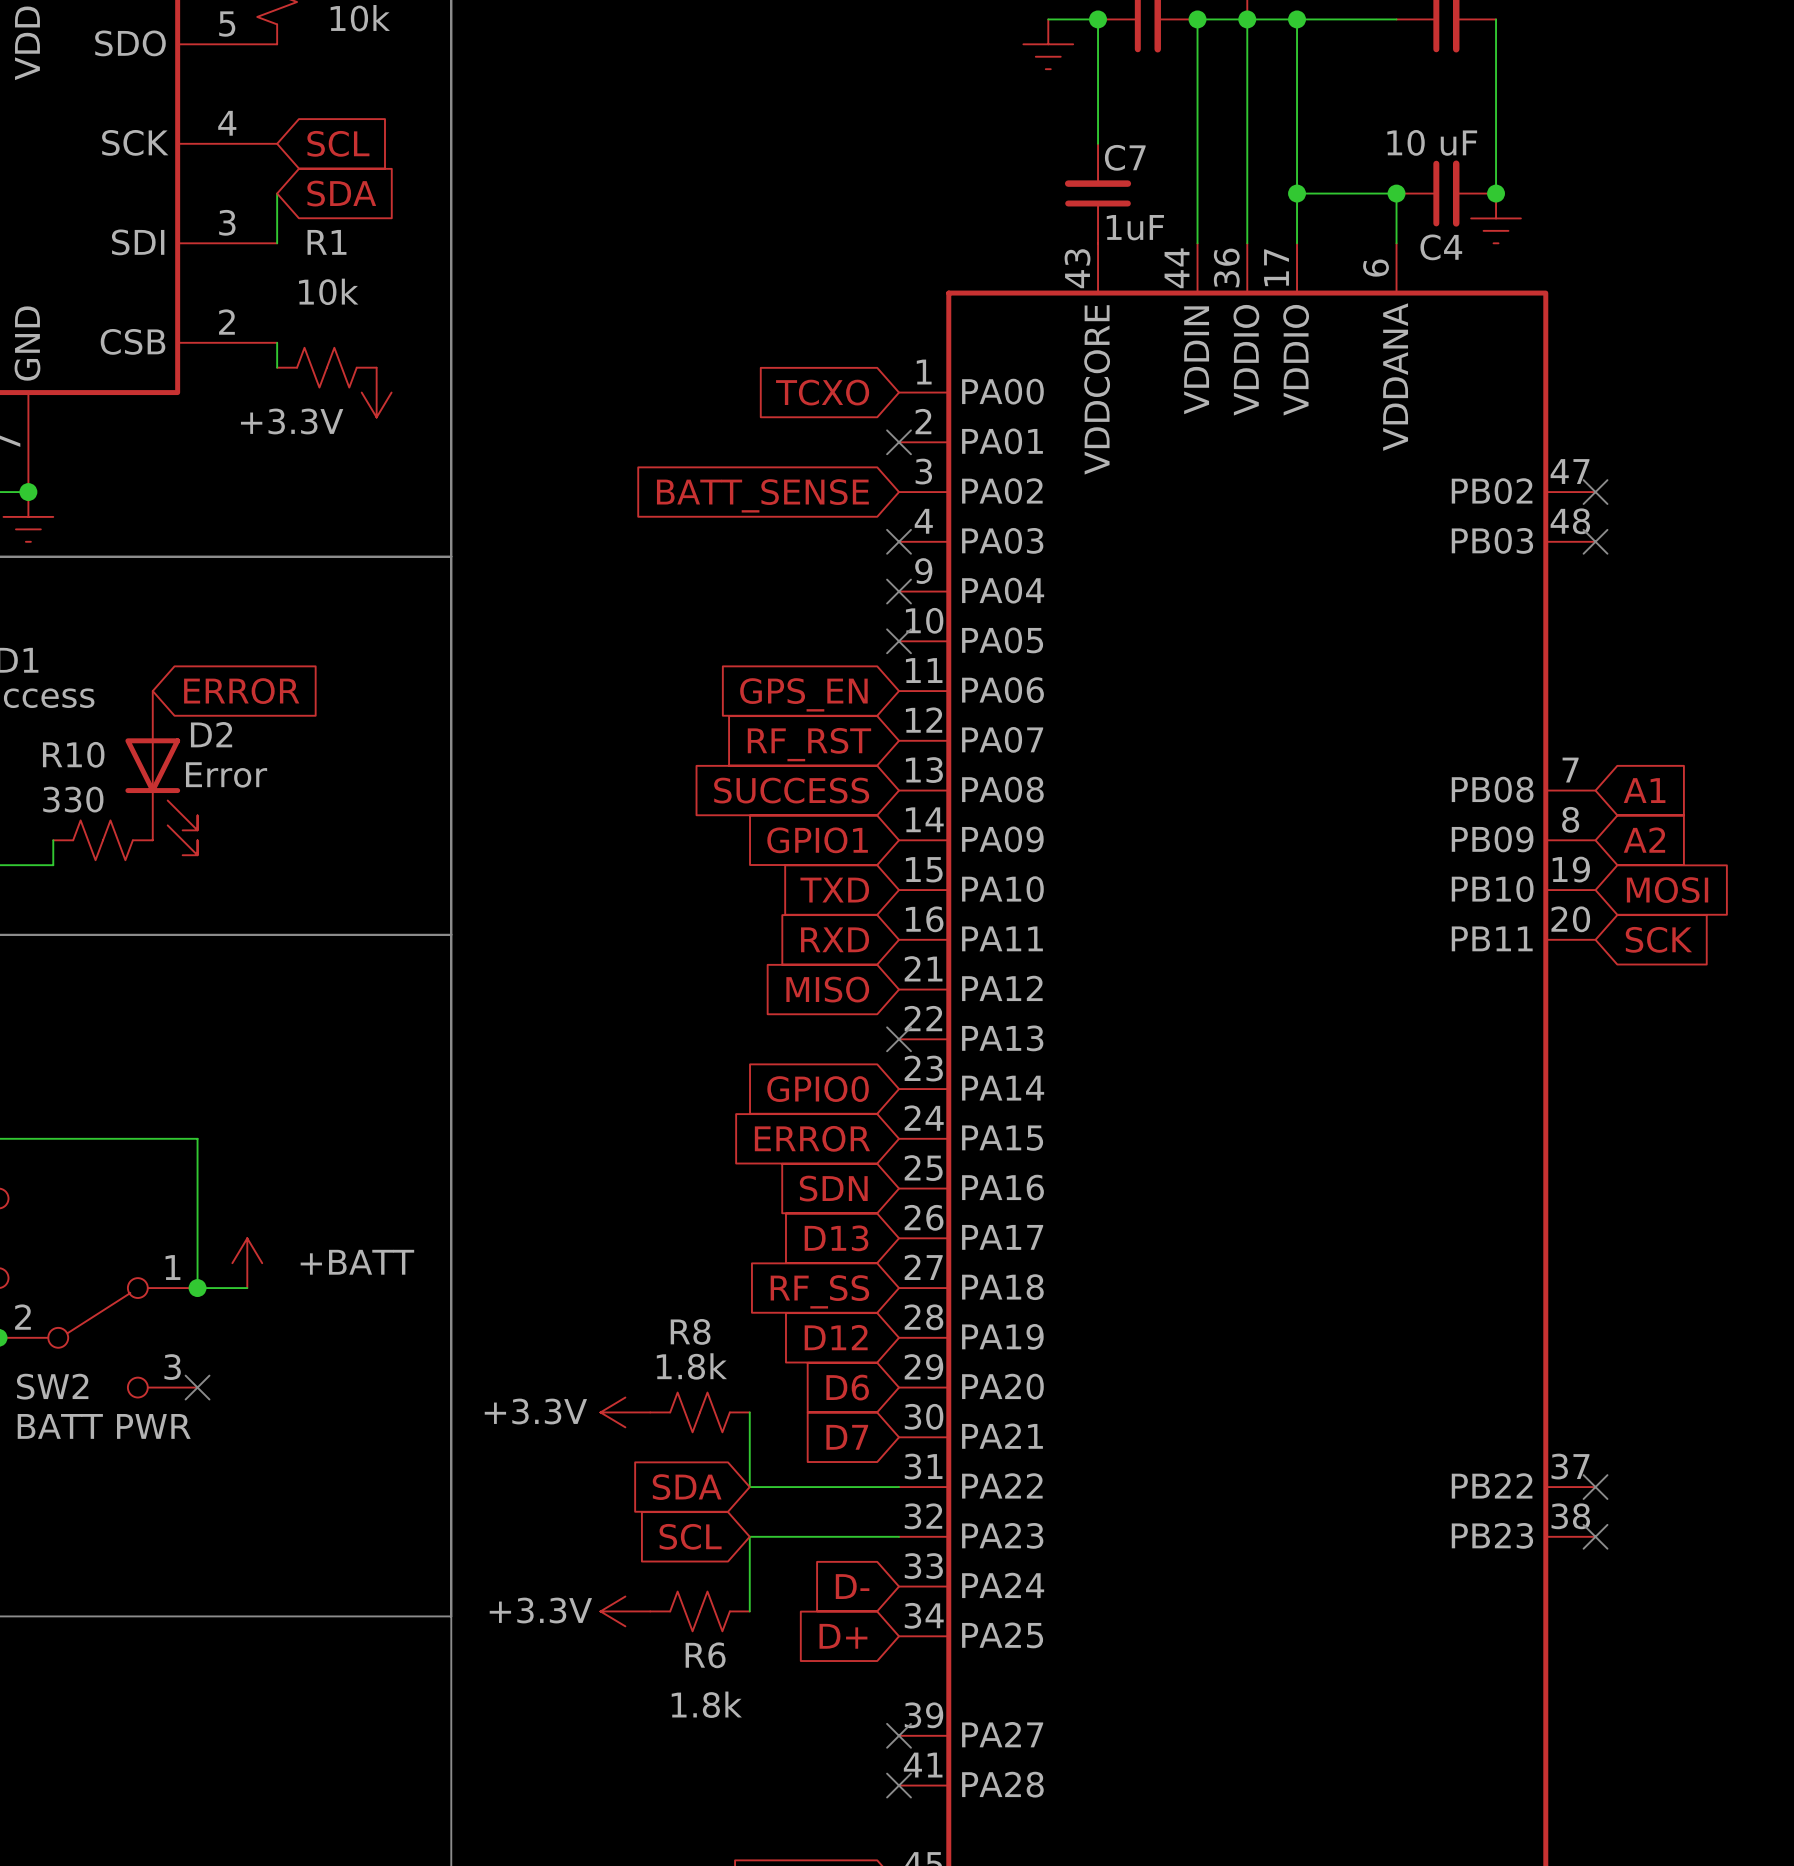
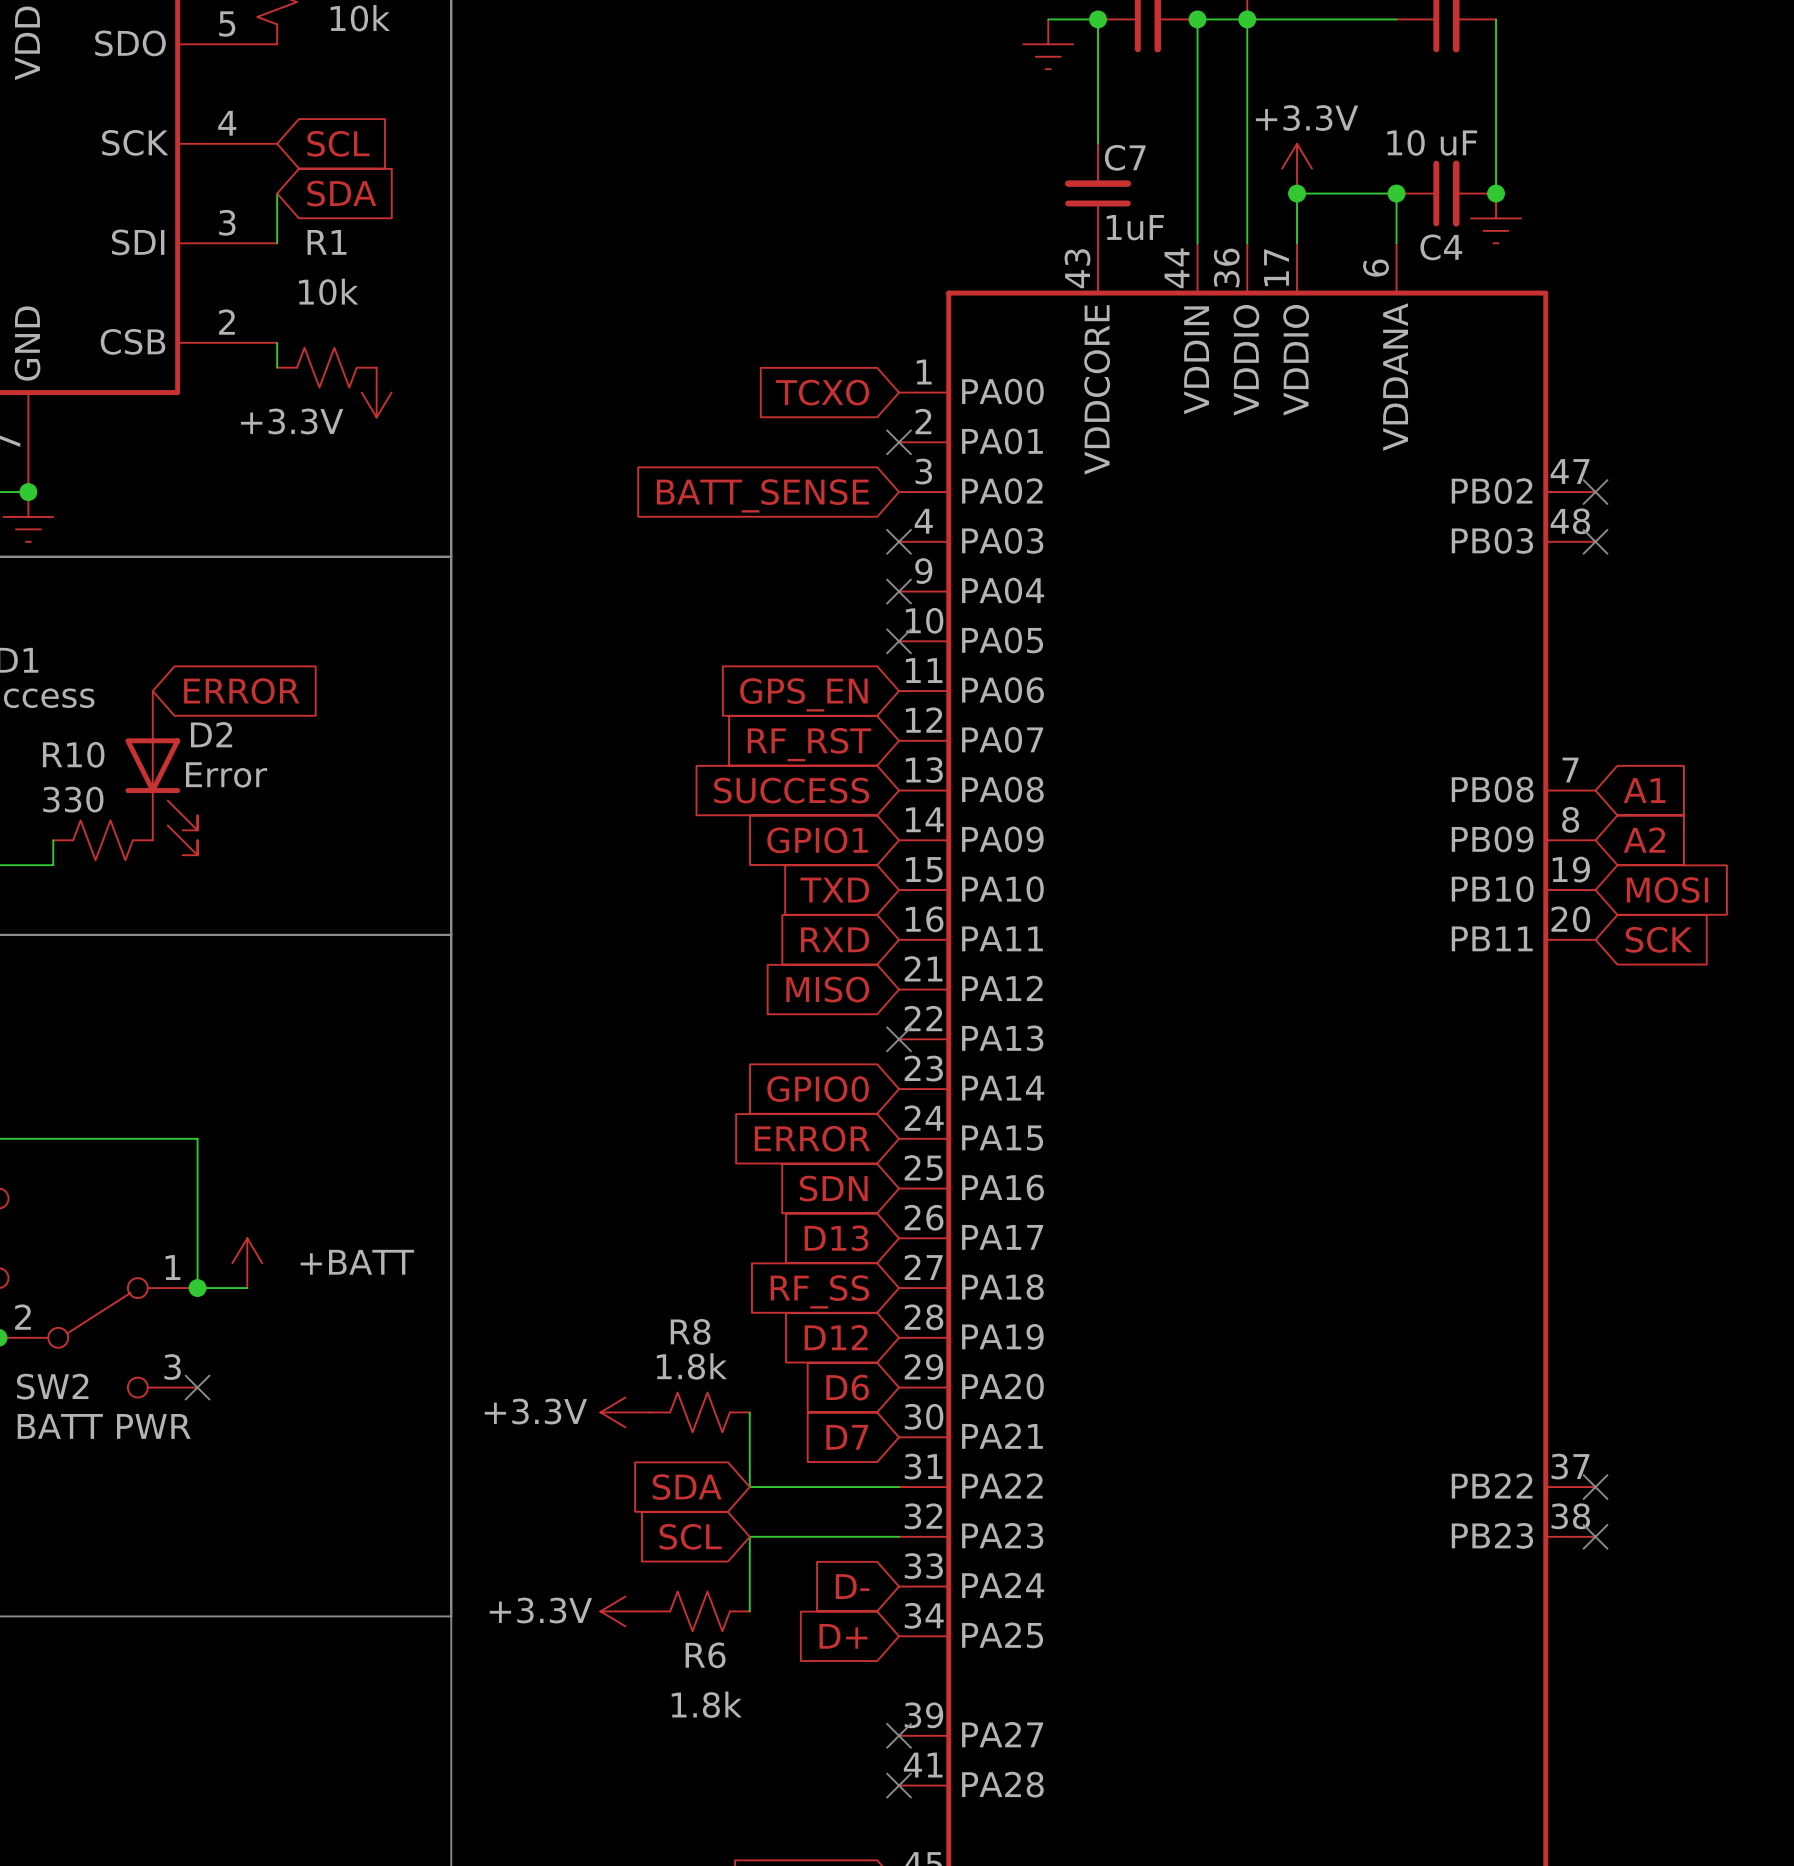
wire: (1297, 19) (1297, 193) -> none
junction: (1297, 19) -> none
power symbol: none -> +3.3V (1297, 168)

